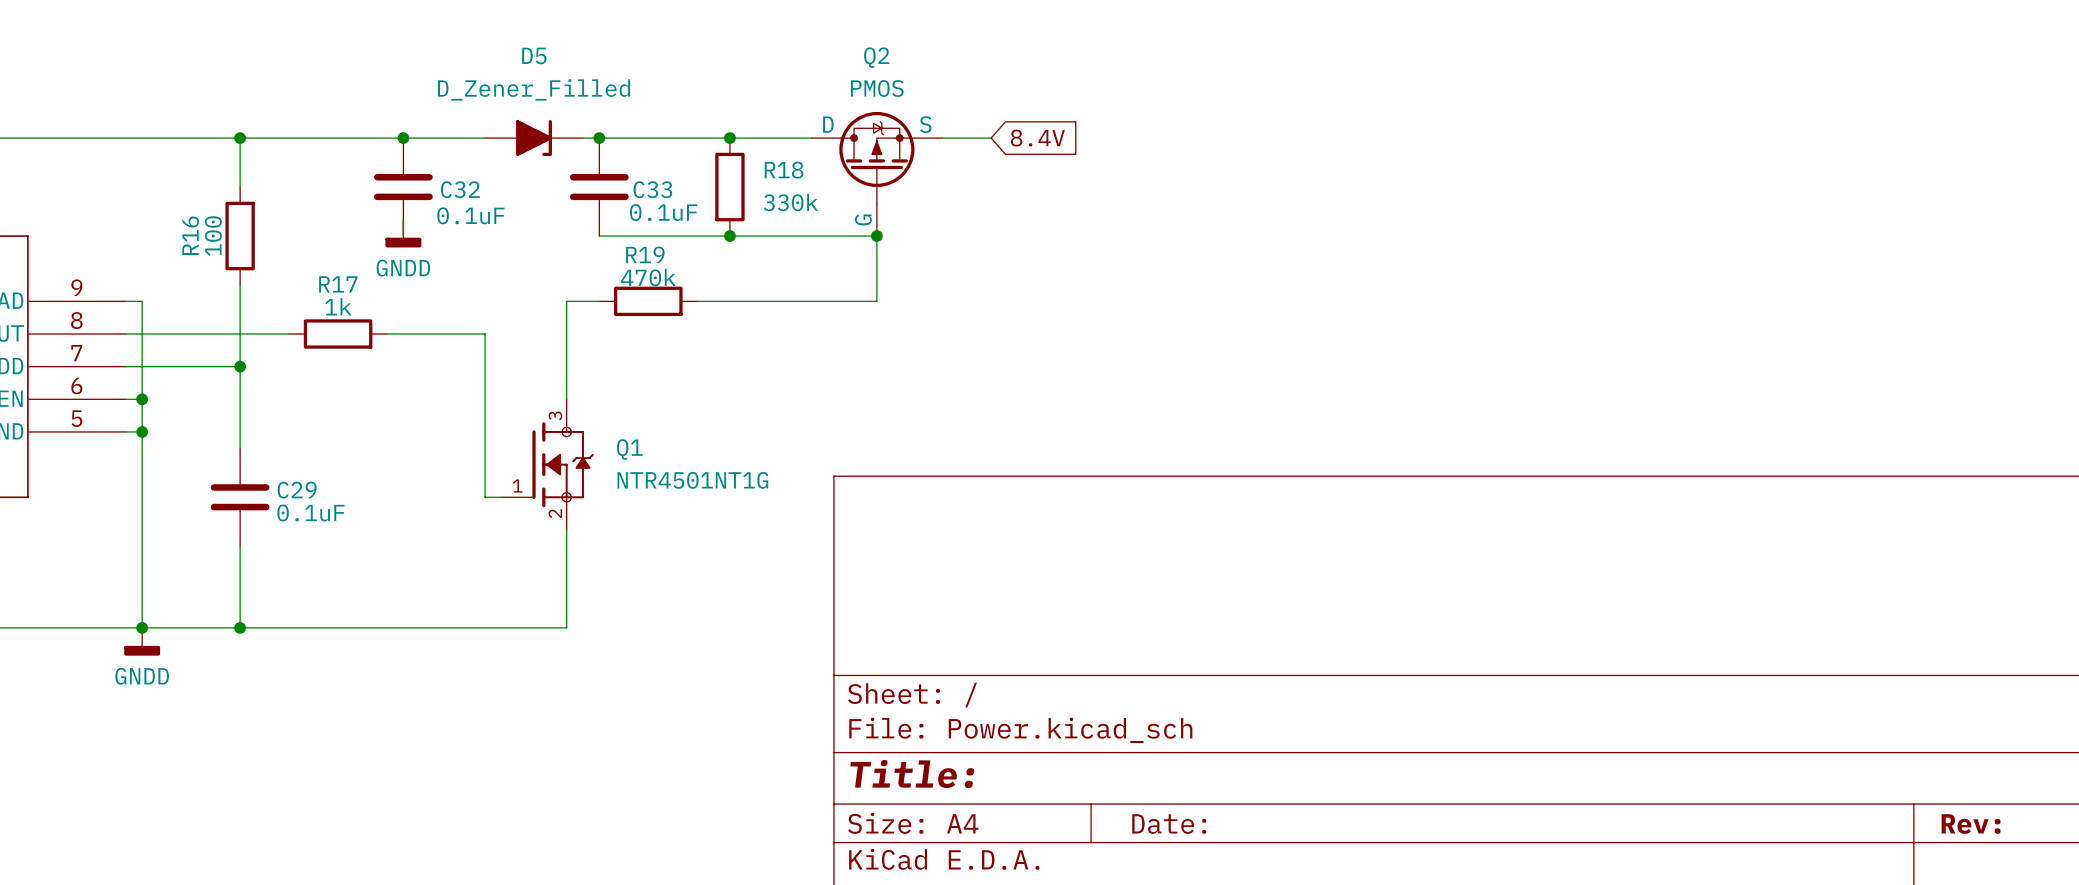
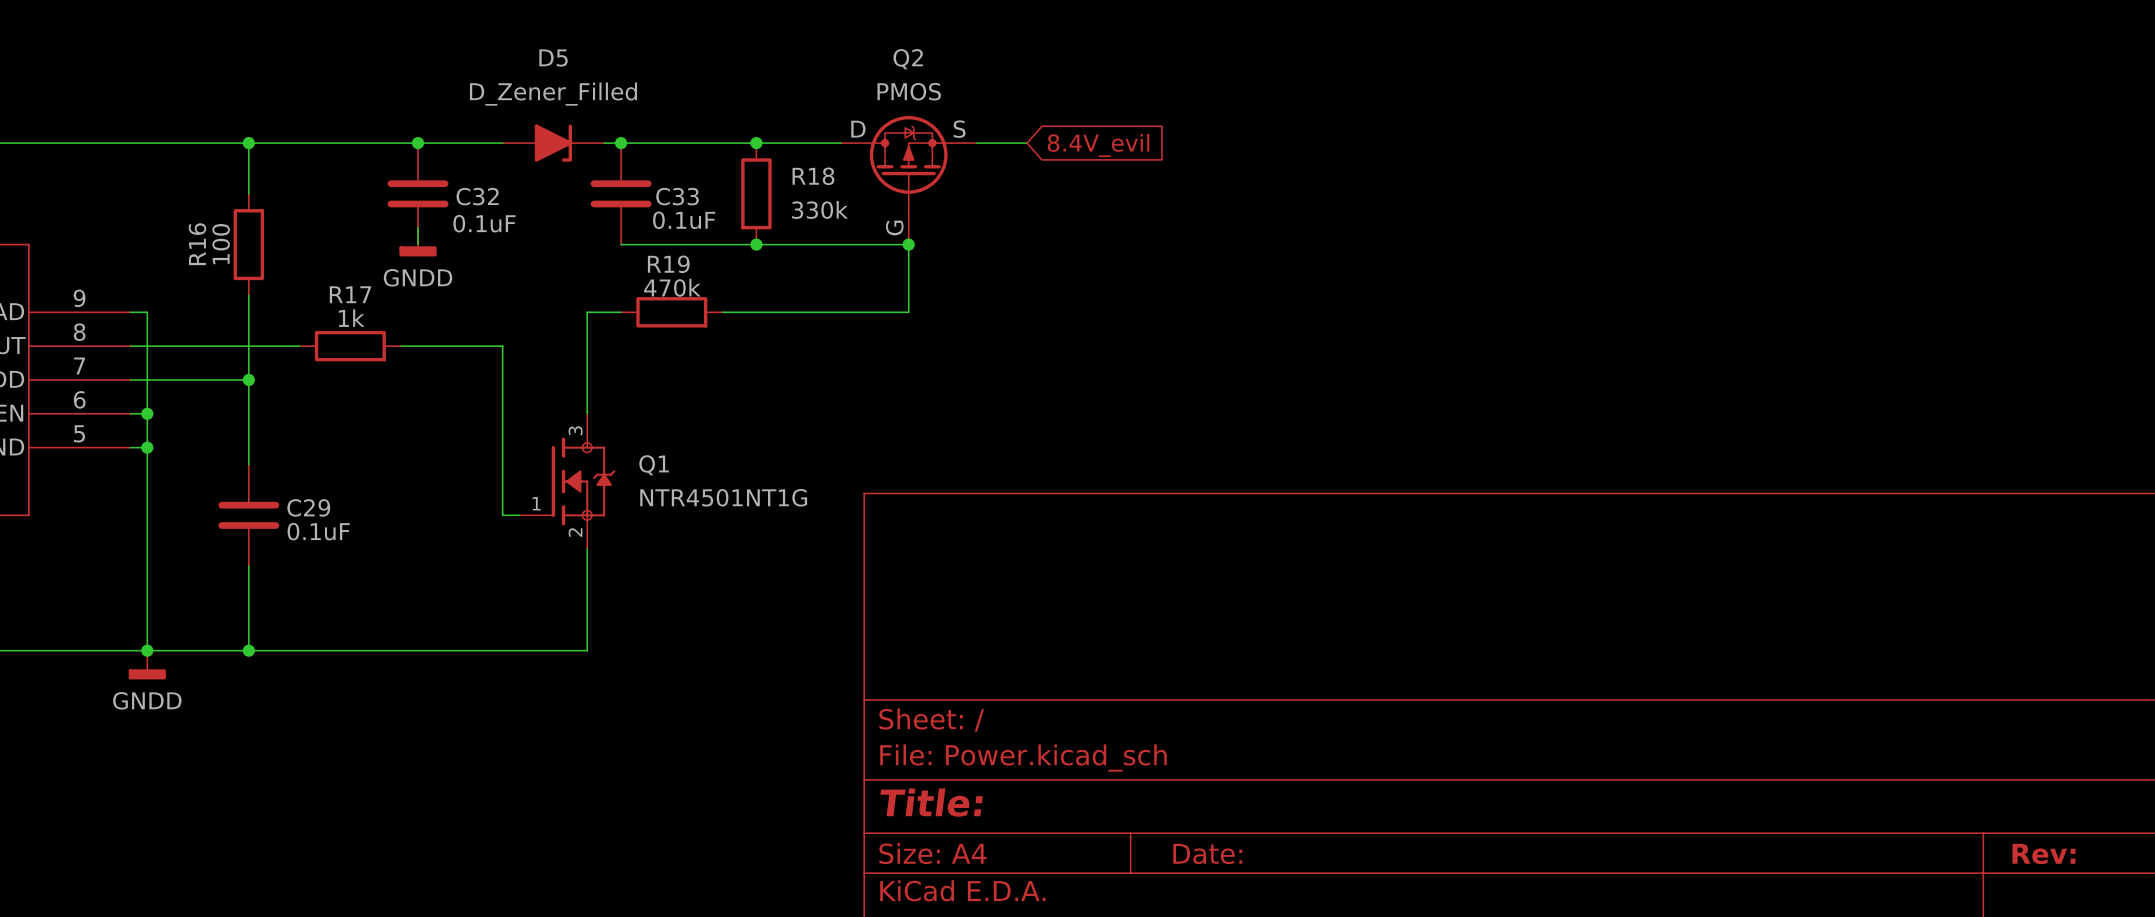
global label: 8.4V (1037, 138) -> 8.4V_evil (1098, 145)

